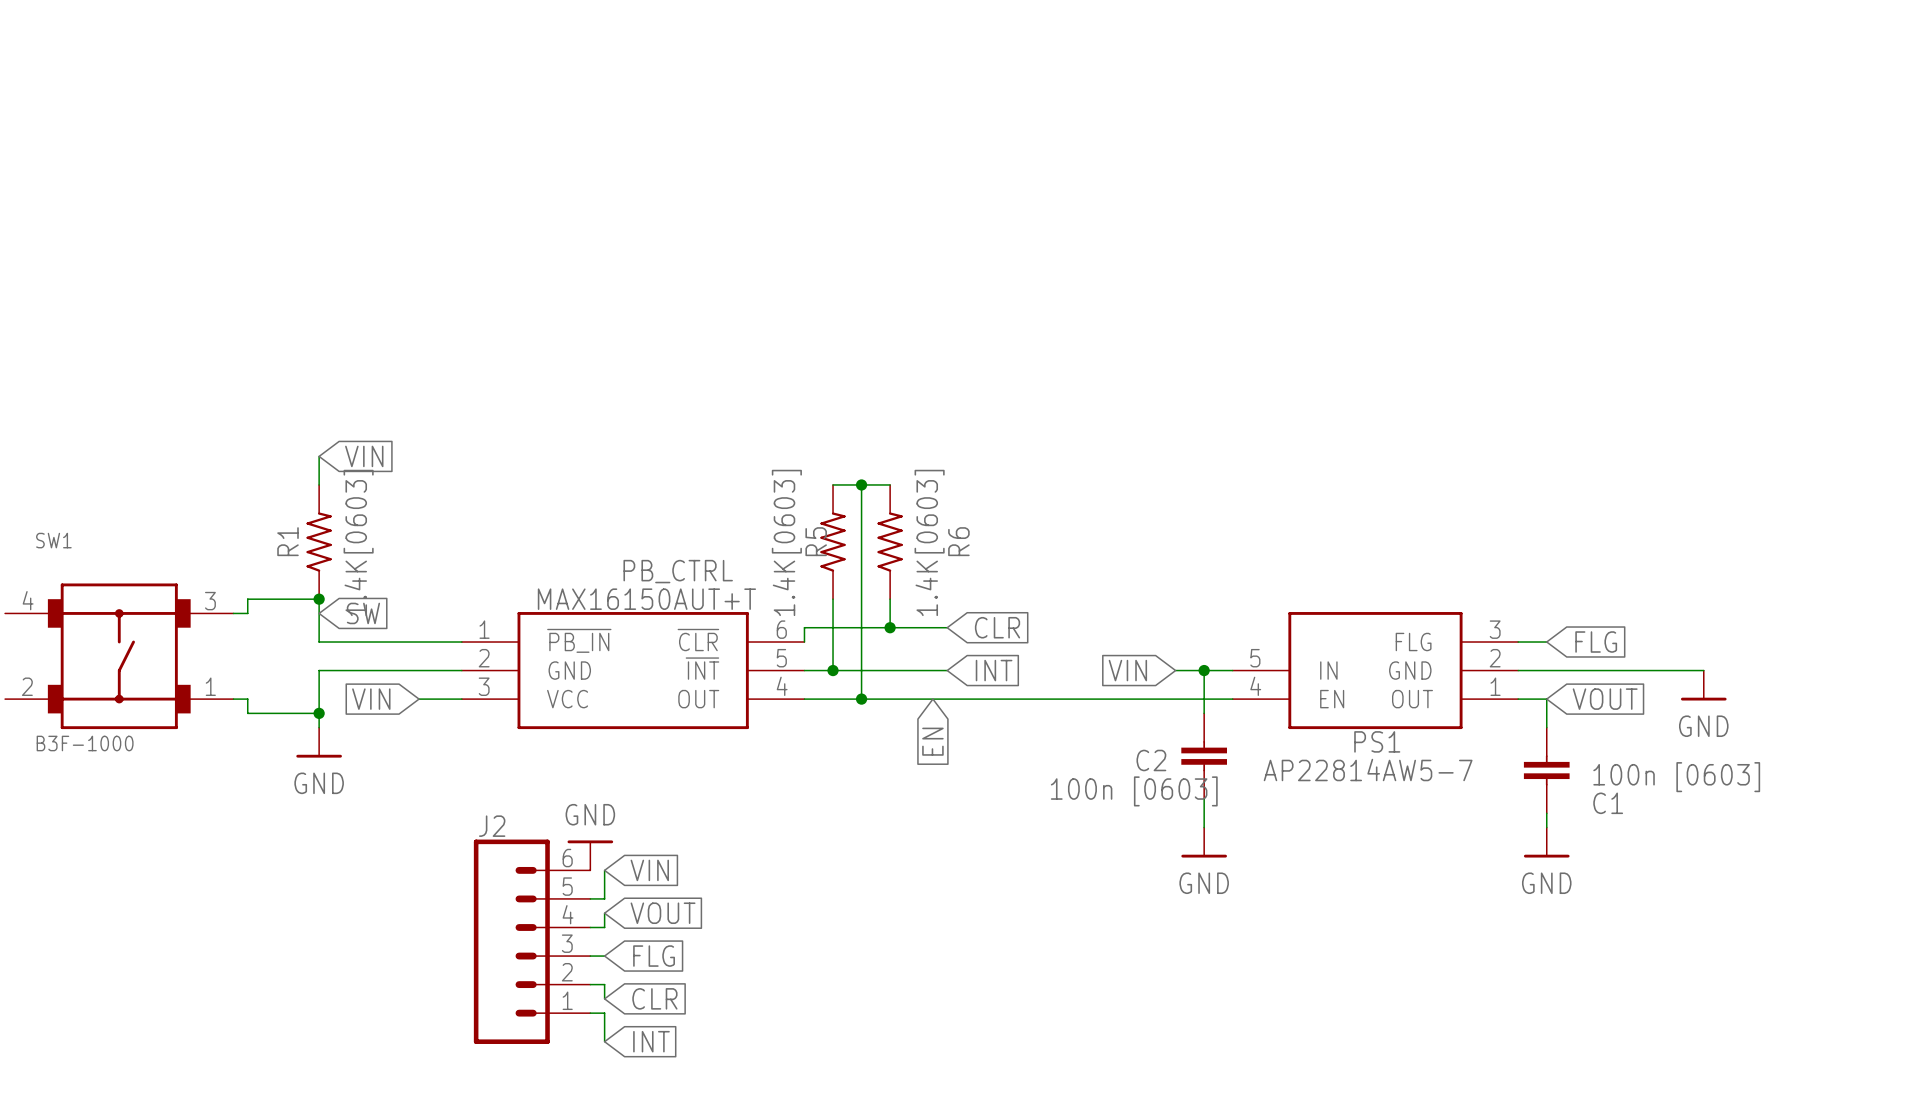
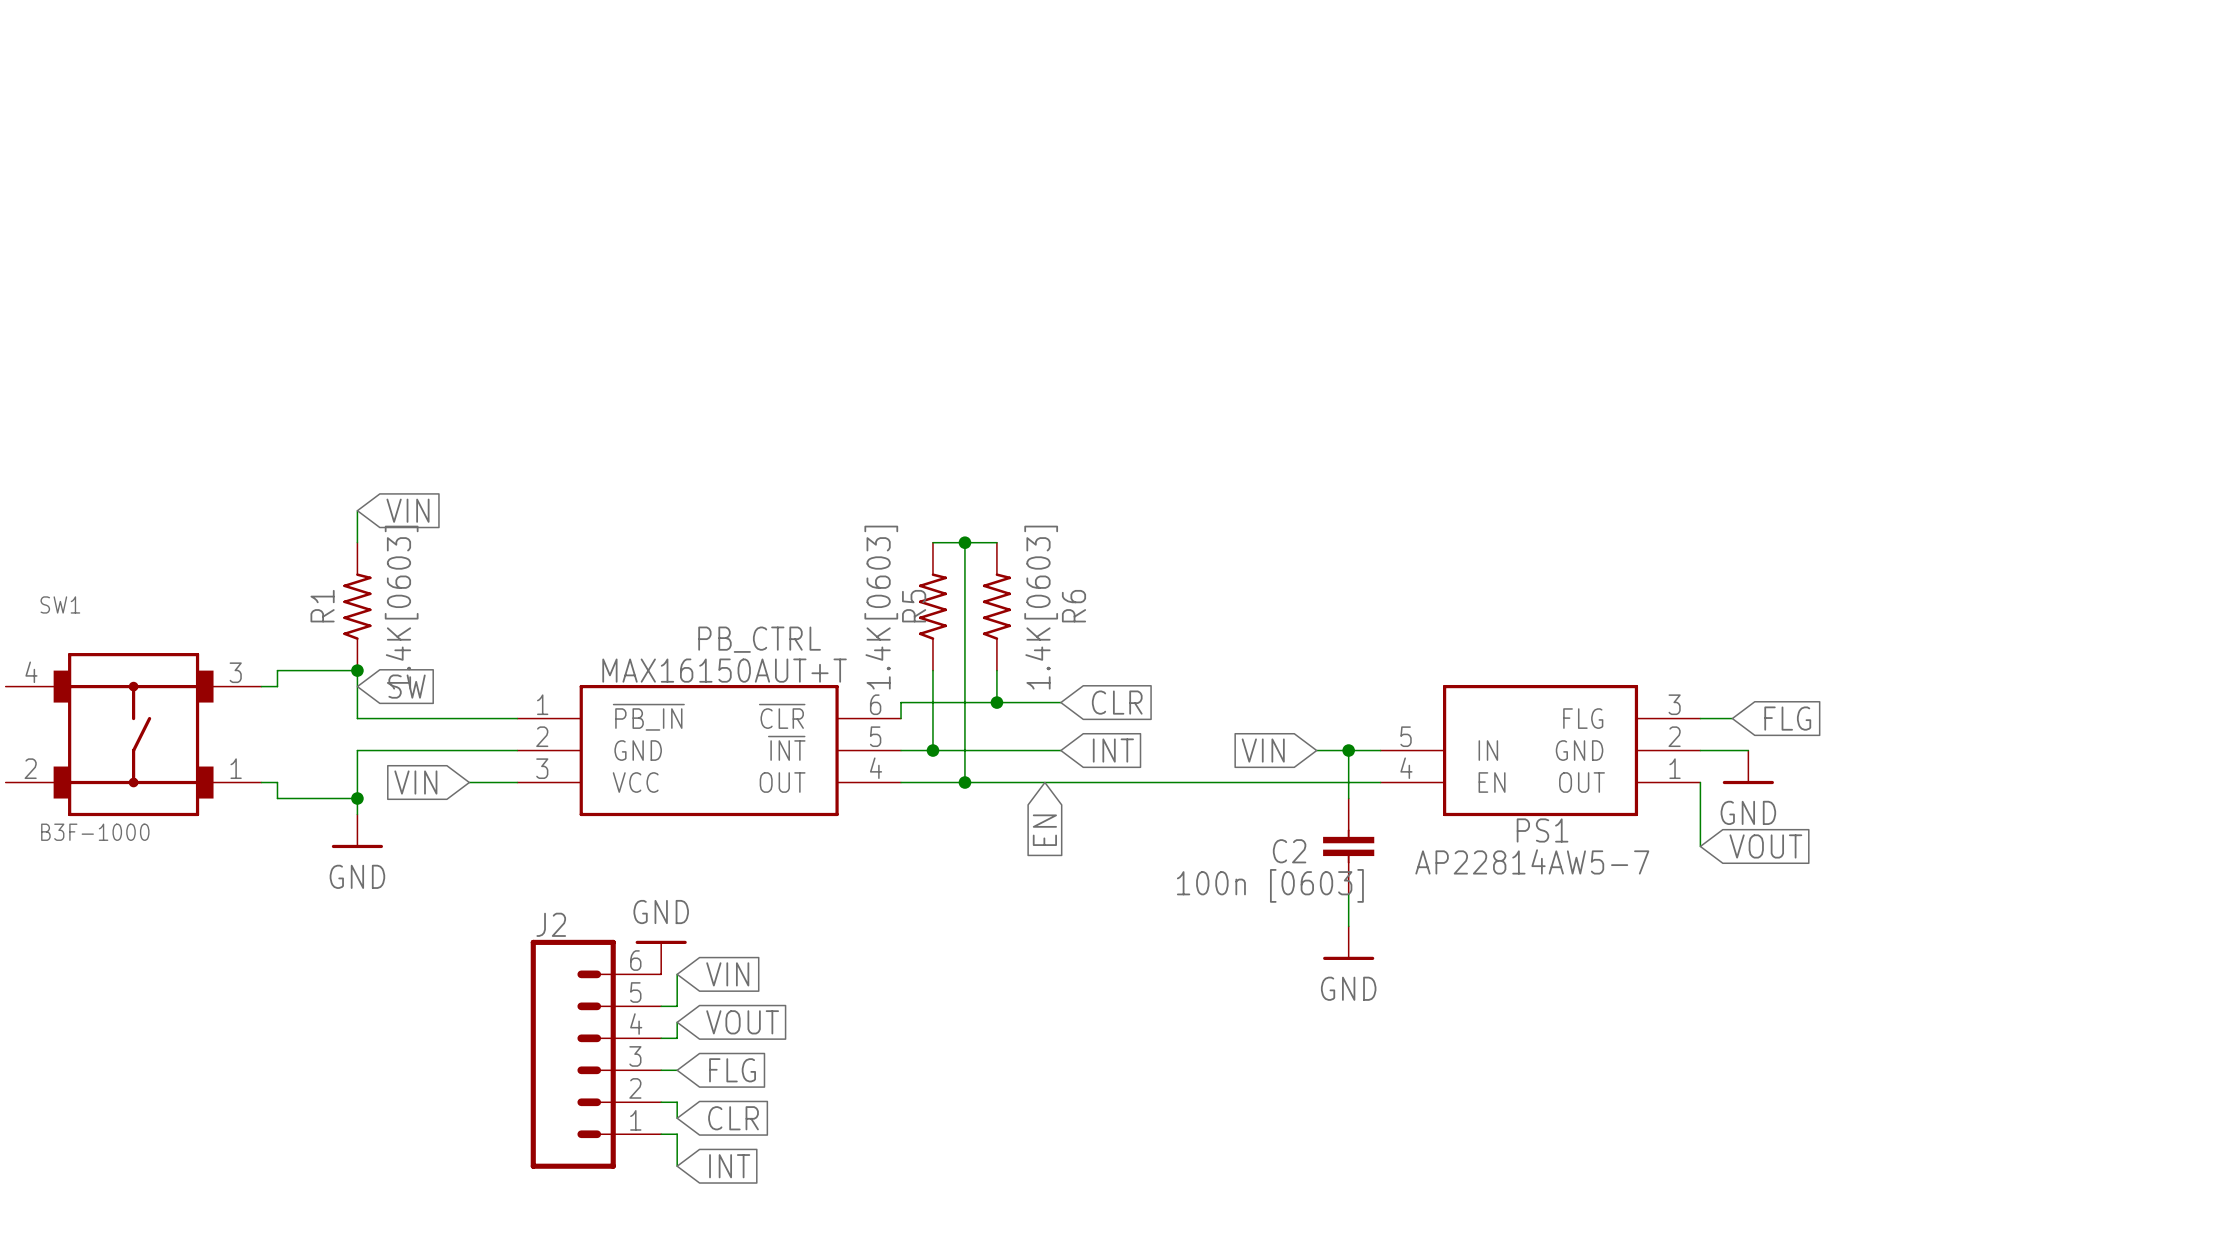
wire: (1561, 670) (1703, 670) -> none
power symbol: none -> GND (1748, 767)
power symbol: GND (1703, 685) -> none
wire: (1518, 699) (1546, 699) (1546, 727) -> (1700, 782) (1700, 846)
global label position: VOUT (1605, 699) -> VOUT (1765, 846)
C1: 100n [0603] (1546, 770) -> none
wire: (1546, 813) (1546, 827) -> none
power symbol: GND (1546, 842) -> none

